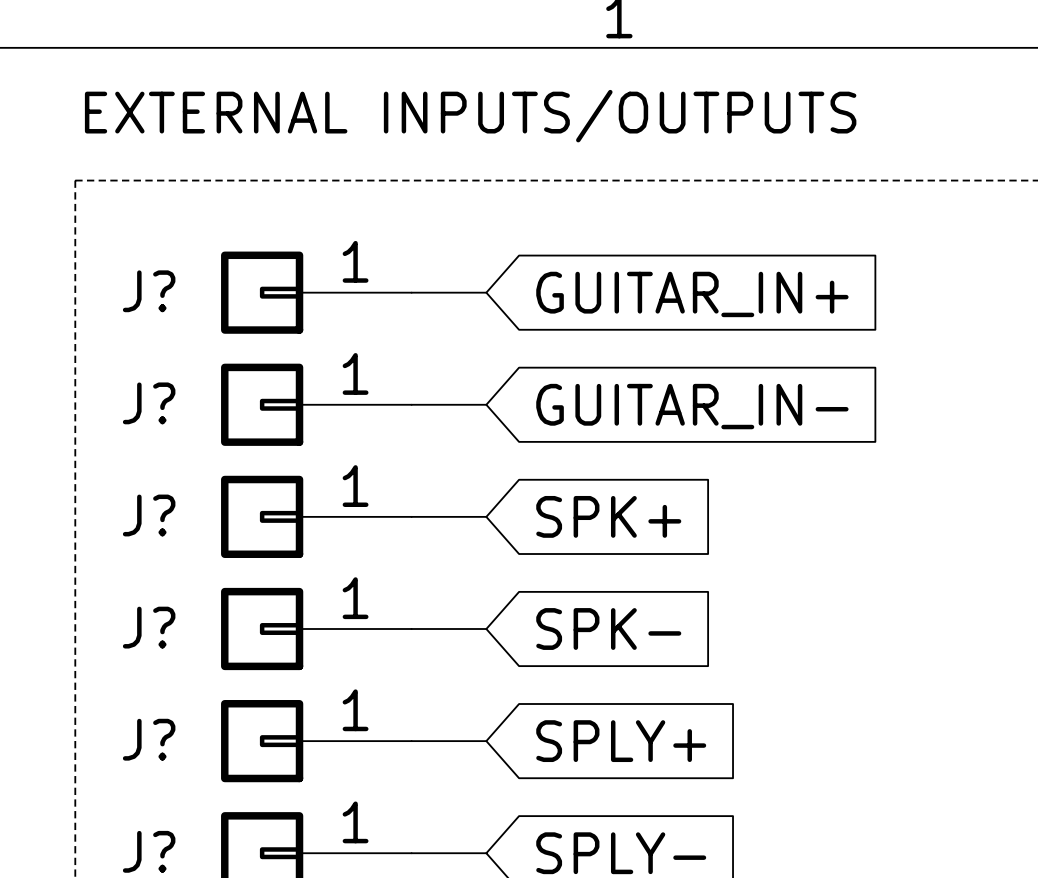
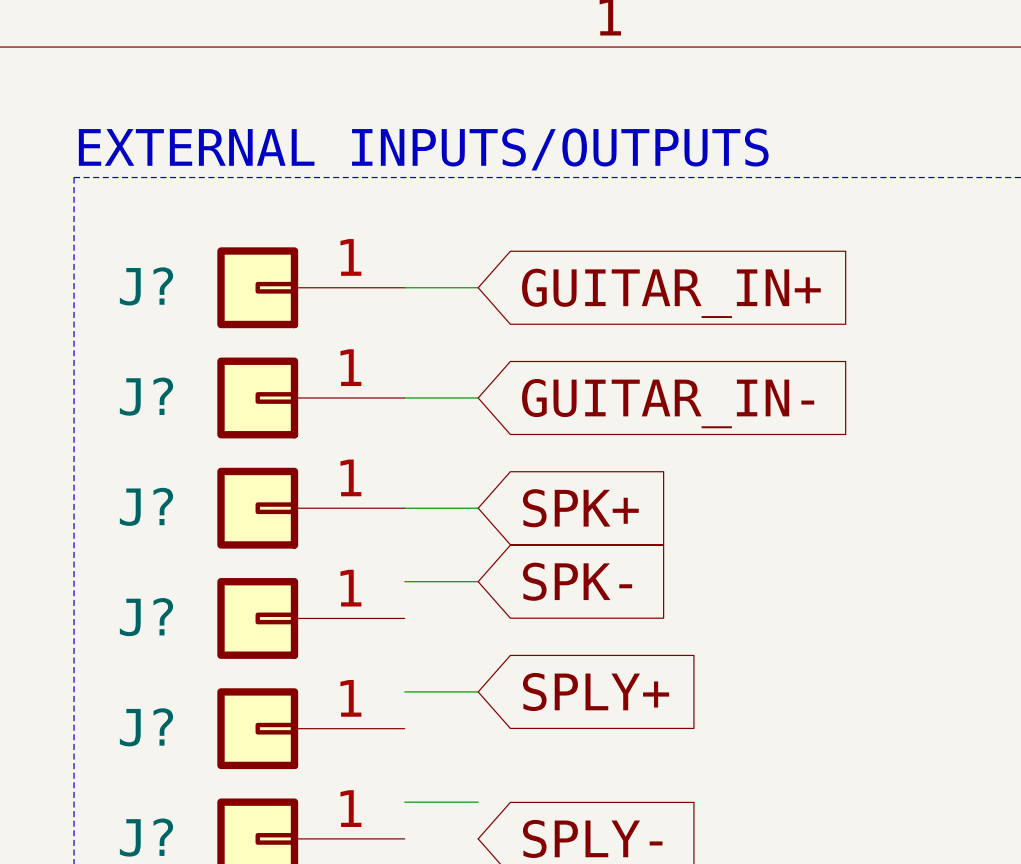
text position: EXTERNAL INPUTS/OUTPUTS (470, 116) -> EXTERNAL INPUTS/OUTPUTS (423, 149)
wire: (411, 629) (486, 629) -> (404, 581) (478, 581)
global label position: SPK- (608, 629) -> SPK- (577, 581)
wire: (411, 741) (486, 741) -> (404, 691) (478, 691)
global label position: SPLY+ (621, 741) -> SPLY+ (596, 691)
wire: (411, 853) (486, 853) -> (404, 802) (478, 802)

